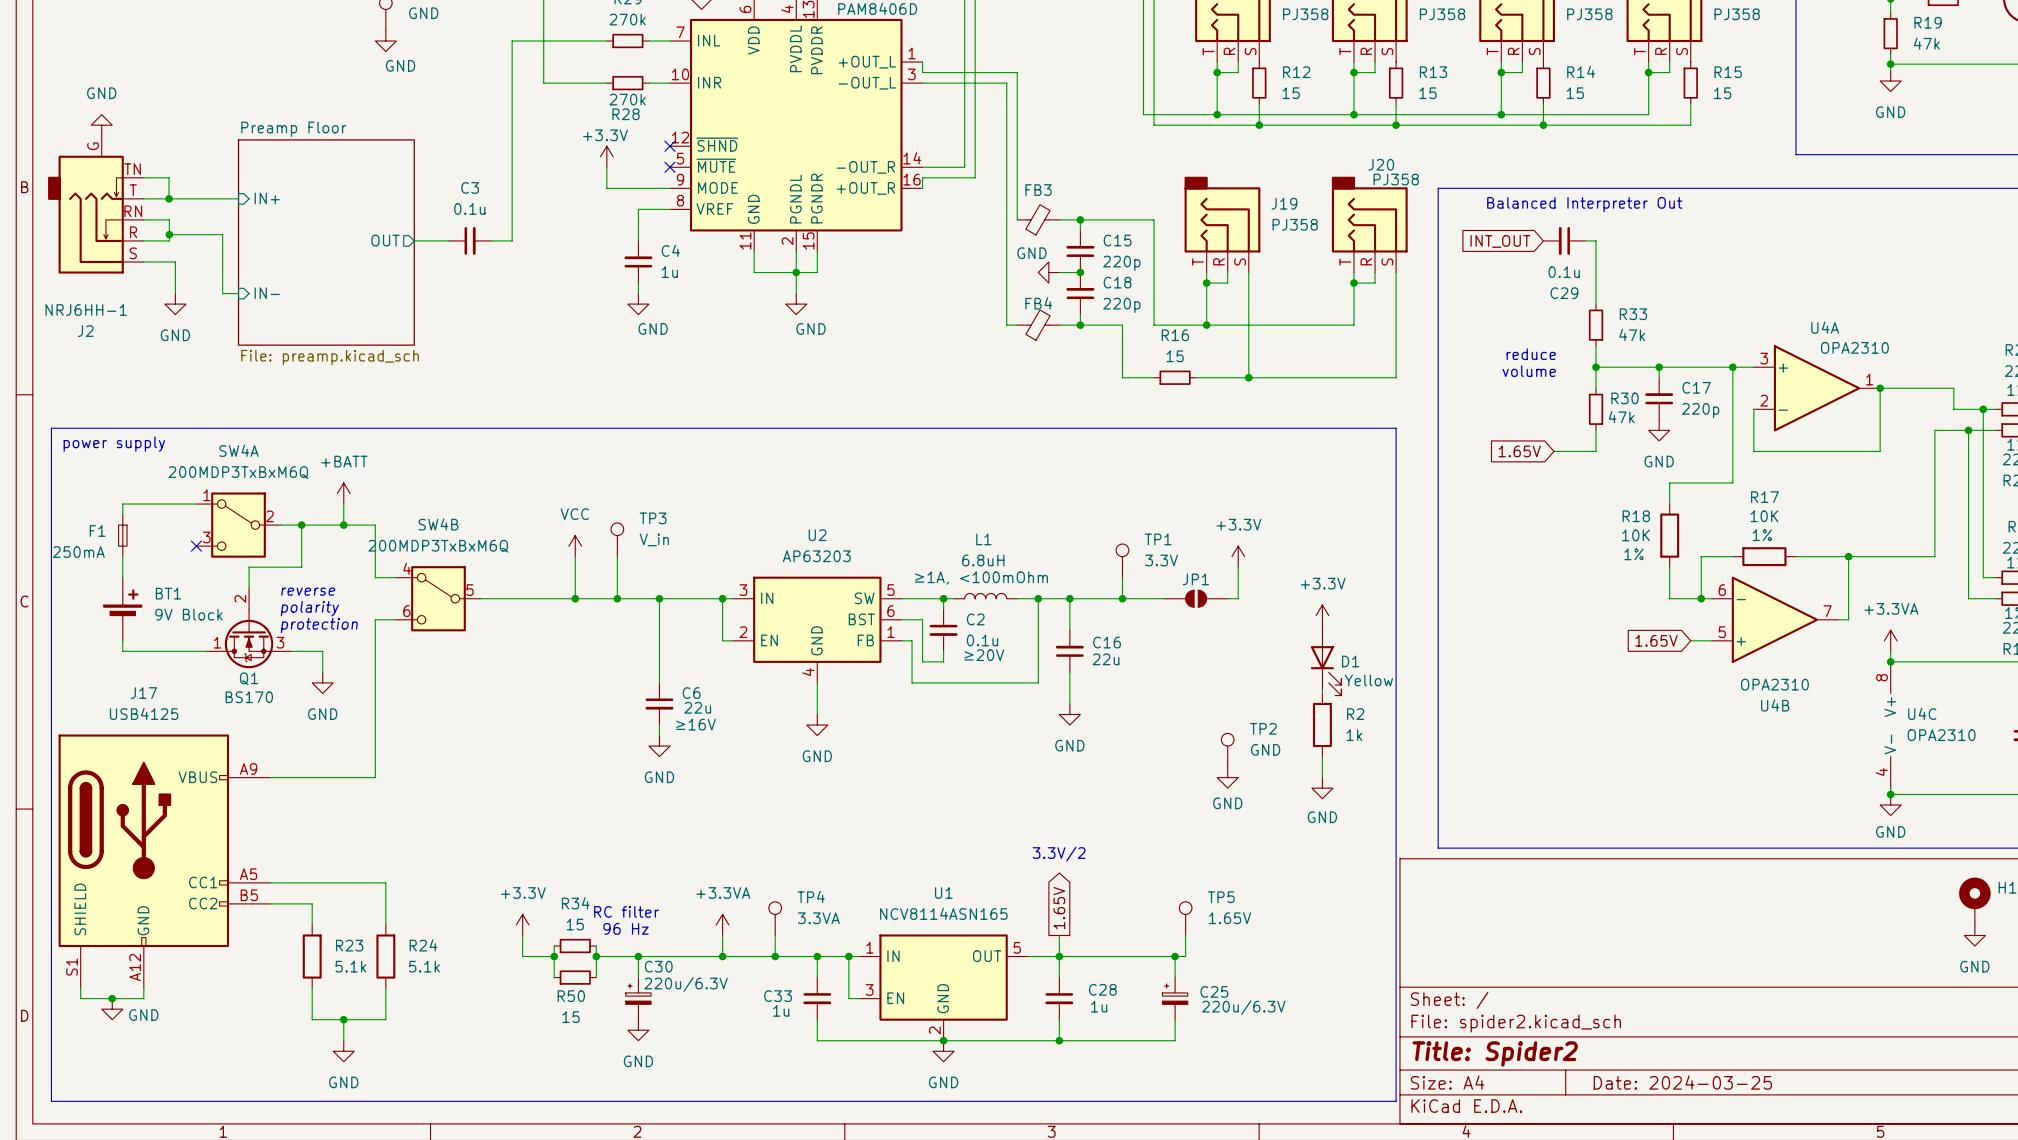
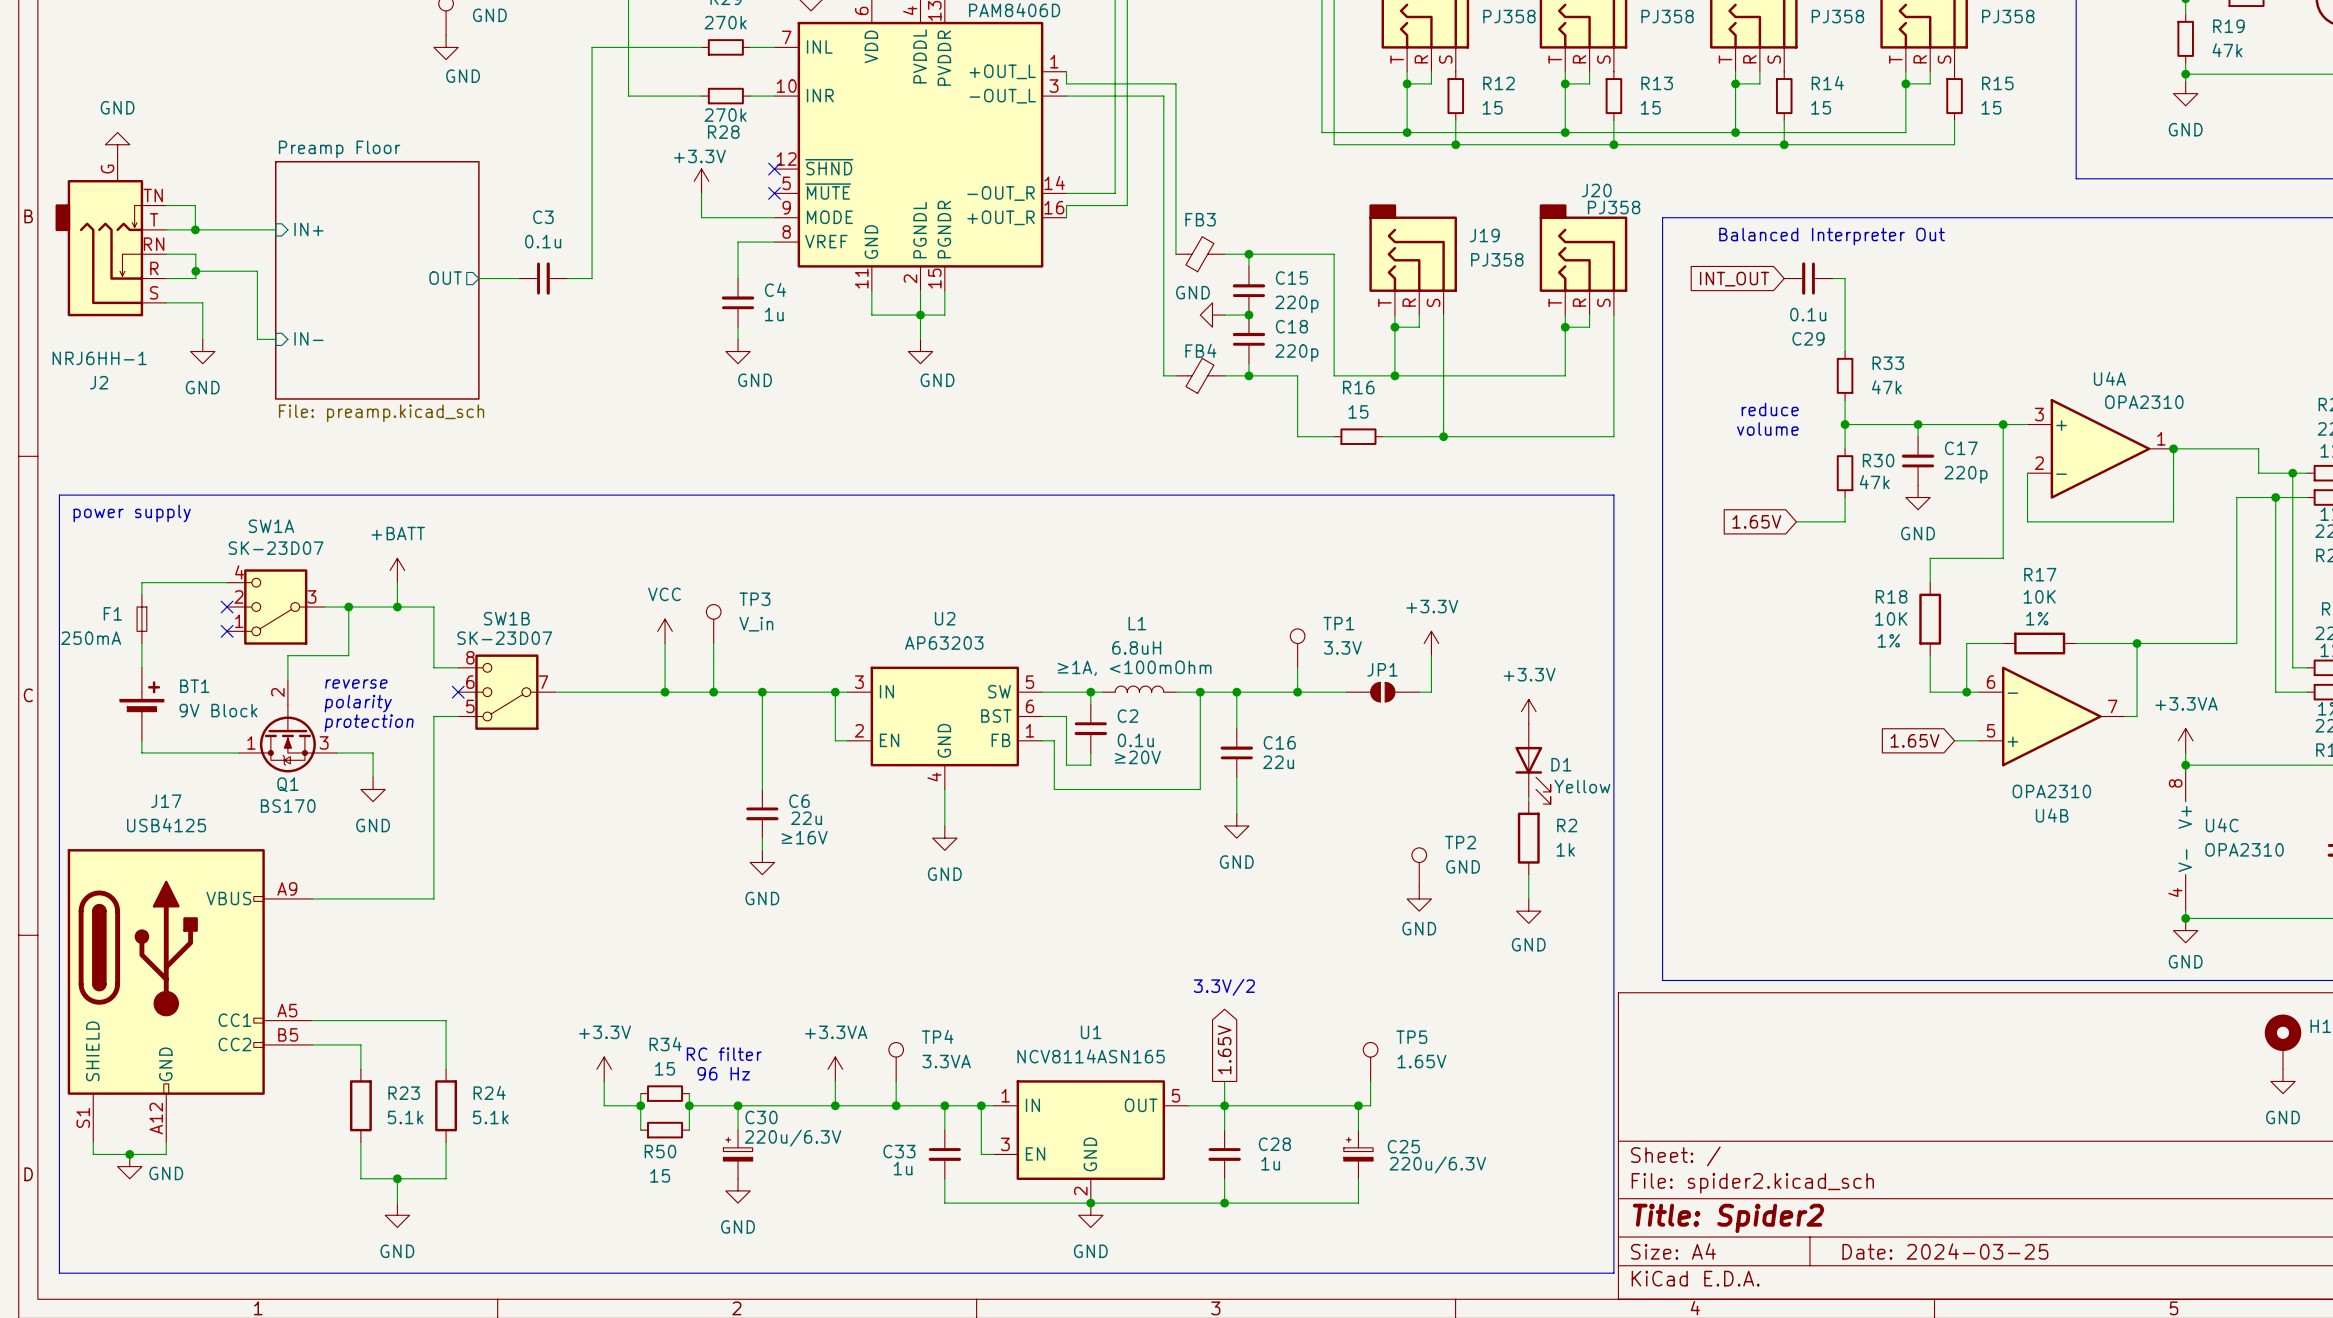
no-connect mark: none -> (227, 607)
SW4A: 200MDP3TxBxM6Q (238, 525) -> none
SW1A: none -> SK-23D07 (275, 607)
no-connect mark: none -> (458, 692)
SW4B: 200MDP3TxBxM6Q (438, 598) -> none
SW1B: none -> SK-23D07 (506, 692)

